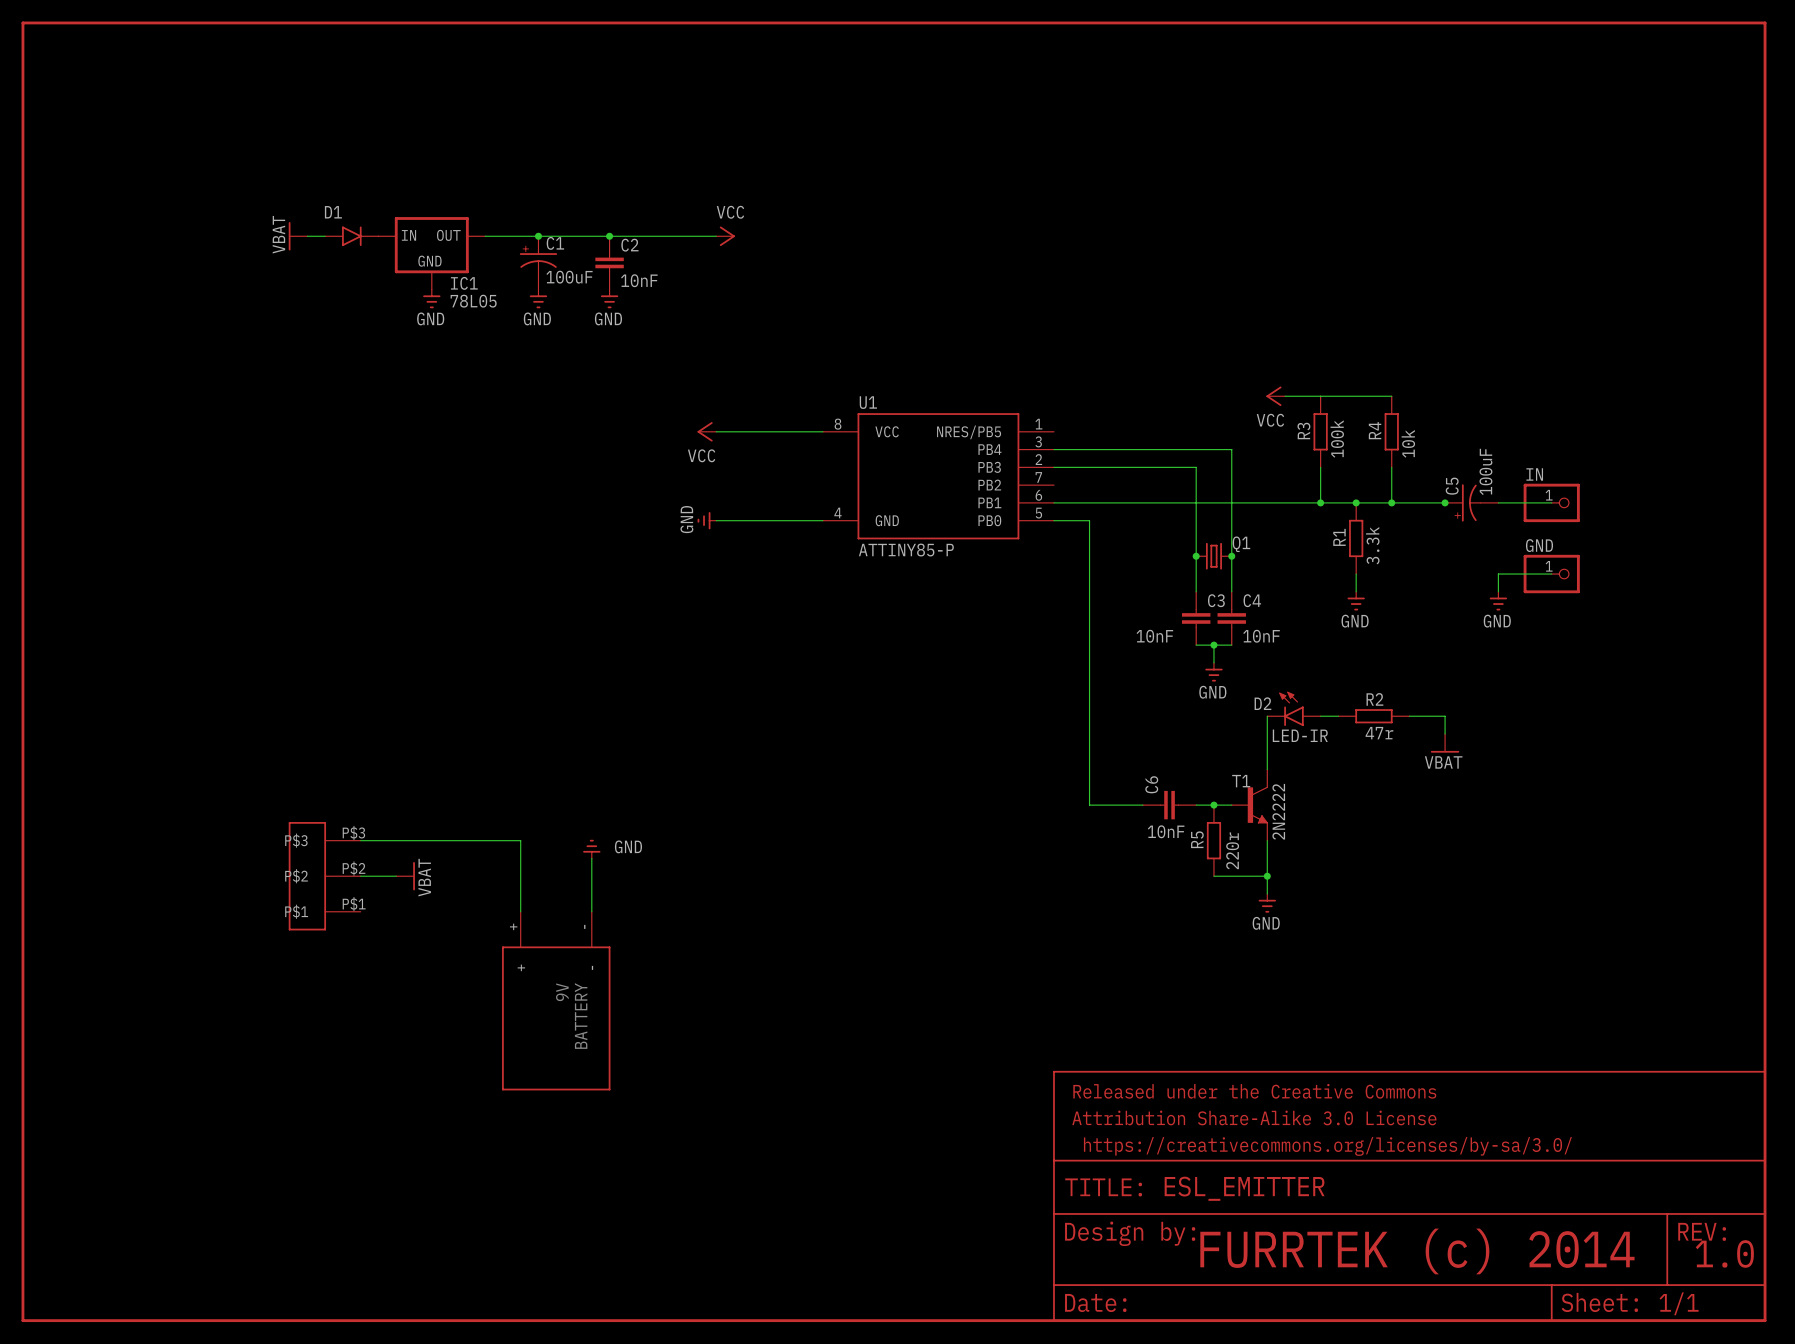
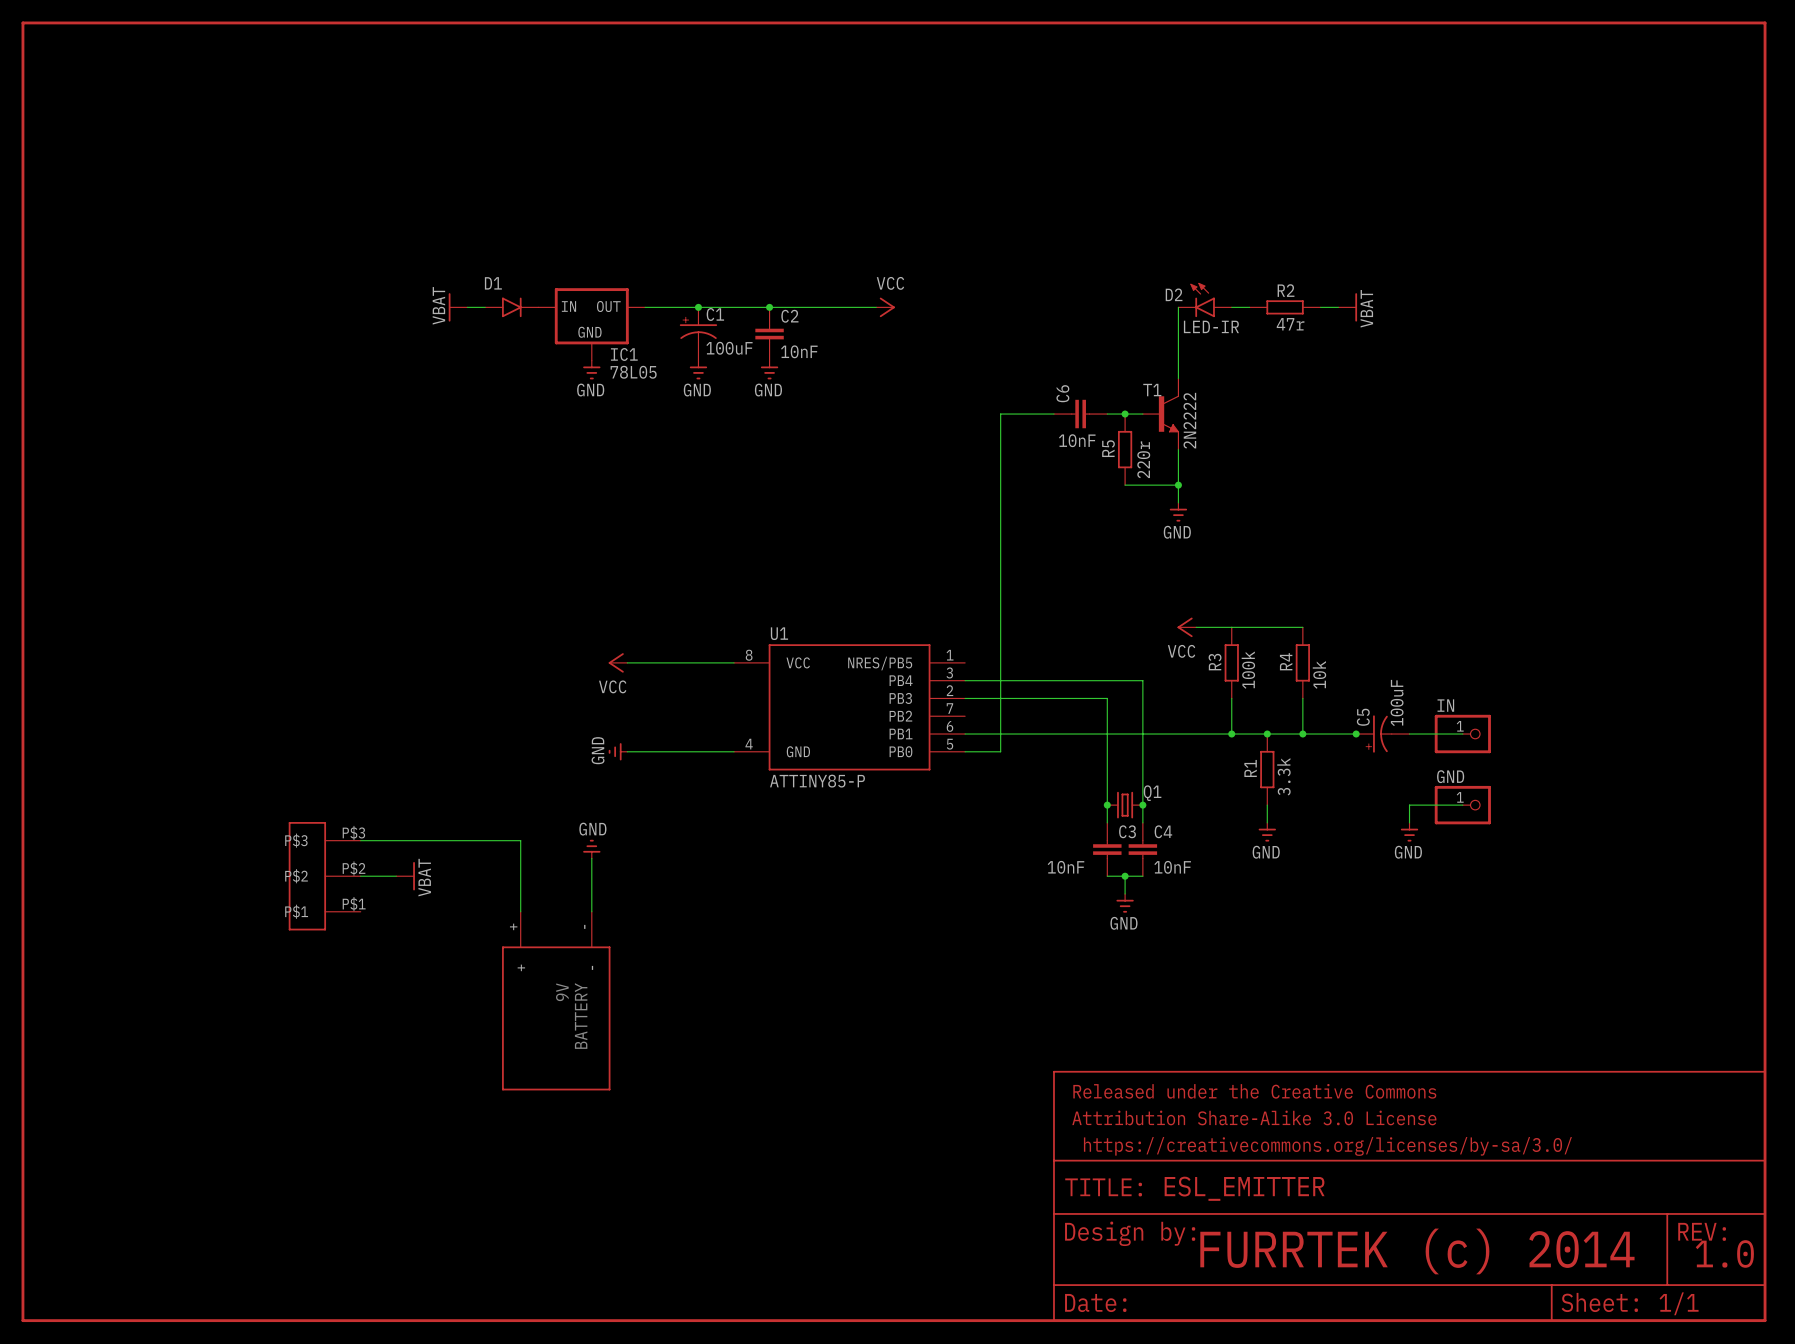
power symbol: VBAT (298, 236) -> none
wire: (307, 236) (325, 236) -> none
D1 position: (351, 236) -> (511, 307)
wire: (485, 236) (716, 236) -> none
junction: (538, 236) -> none
junction: (609, 236) -> none
power symbol: VCC (725, 236) -> none
IC1 position: (431, 253) -> (591, 324)
C1 position: (538, 262) -> (698, 334)
C2 position: (609, 262) -> (769, 334)
power symbol: GND (431, 298) -> none
power symbol: GND (538, 298) -> none
power symbol: GND (609, 298) -> none
power symbol: none -> VBAT (458, 307)
wire: none -> (467, 307) (485, 307)
wire: none -> (645, 307) (876, 307)
junction: none -> (698, 307)
junction: none -> (769, 307)
power symbol: none -> VCC (885, 307)
wire: none -> (1178, 307) (1178, 378)
wire: none -> (1231, 307) (1249, 307)
wire: none -> (1320, 307) (1338, 307)
power symbol: none -> VBAT (1347, 307)
power symbol: none -> GND (591, 369)
power symbol: none -> GND (698, 369)
power symbol: none -> GND (769, 369)
power symbol: VCC (1275, 396) -> none
wire: (1285, 396) (1391, 396) -> none
wire: none -> (1053, 414) (1000, 414) (1000, 751) (965, 751)
wire: none -> (1107, 414) (1142, 414)
junction: none -> (1125, 414)
power symbol: VCC (706, 431) -> none
wire: (716, 431) (822, 431) -> none
R3 position: (1320, 431) -> (1231, 662)
R4 position: (1391, 431) -> (1302, 662)
wire: (1053, 449) (1231, 449) (1231, 591) -> none
wire: none -> (1178, 449) (1178, 502)
wire: (1053, 467) (1196, 467) (1196, 591) -> none
wire: (1320, 467) (1320, 502) -> none
wire: (1391, 467) (1391, 502) -> none
U1 position: (938, 476) -> (849, 707)
wire: none -> (1125, 485) (1178, 485)
junction: none -> (1178, 485)
wire: (1053, 502) (1445, 502) -> none
junction: (1320, 502) -> none
junction: (1356, 502) -> none
junction: (1391, 502) -> none
junction: (1445, 502) -> none
C5 position: (1471, 502) -> (1382, 734)
wire: (1498, 502) (1551, 502) -> none
IN: (1551, 502) -> none
power symbol: none -> GND (1178, 511)
power symbol: GND (707, 520) -> none
wire: (716, 520) (822, 520) -> (627, 662) (734, 662)
wire: (1053, 520) (1089, 520) (1089, 805) (1142, 805) -> none
R1 position: (1356, 538) -> (1267, 769)
junction: (1196, 556) -> none
Q1 position: (1213, 556) -> (1125, 805)
junction: (1231, 556) -> none
wire: (1356, 574) (1356, 591) -> none
wire: (1551, 574) (1498, 574) (1498, 591) -> none
GND: (1551, 574) -> none
power symbol: GND (1356, 600) -> none
power symbol: GND (1498, 600) -> none
C3 position: (1196, 618) -> (1107, 849)
C4 position: (1231, 618) -> (1142, 849)
power symbol: none -> VCC (1186, 627)
wire: none -> (1196, 627) (1302, 627)
wire: (1196, 645) (1231, 645) -> none
wire: (1213, 645) (1213, 662) -> (1267, 805) (1267, 822)
junction: (1213, 645) -> none
power symbol: none -> VCC (618, 662)
power symbol: GND (1213, 671) -> none
wire: none -> (965, 680) (1142, 680) (1142, 822)
wire: none -> (965, 698) (1107, 698) (1107, 822)
wire: none -> (1231, 698) (1231, 734)
D2 position: (1293, 708) -> (1205, 300)
wire: (1267, 716) (1267, 769) -> none
wire: (1320, 716) (1338, 716) -> none
R2 position: (1373, 716) -> (1285, 307)
wire: (1409, 716) (1445, 716) (1445, 734) -> none
wire: none -> (965, 734) (1356, 734)
junction: none -> (1231, 734)
junction: none -> (1267, 734)
junction: none -> (1302, 734)
junction: none -> (1356, 734)
wire: none -> (1409, 734) (1462, 734)
IN: none -> (1462, 734)
power symbol: VBAT (1445, 743) -> none
power symbol: none -> GND (618, 751)
wire: none -> (627, 751) (734, 751)
junction: none -> (1107, 805)
junction: none -> (1142, 805)
C6 position: (1169, 805) -> (1080, 414)
wire: (1196, 805) (1231, 805) -> (1107, 876) (1142, 876)
junction: (1213, 805) -> none
T1 position: (1249, 805) -> (1160, 414)
wire: none -> (1462, 805) (1409, 805) (1409, 822)
GND: none -> (1462, 805)
power symbol: none -> GND (1267, 831)
power symbol: none -> GND (1409, 831)
R5 position: (1213, 840) -> (1125, 449)
wire: (1267, 840) (1267, 894) -> none
power symbol text position: GND (628, 846) -> GND (592, 829)
wire: none -> (1125, 876) (1125, 894)
junction: none -> (1125, 876)
wire: (1213, 876) (1267, 876) -> none
junction: (1267, 876) -> none
power symbol: none -> GND (1125, 903)
power symbol: GND (1267, 903) -> none

